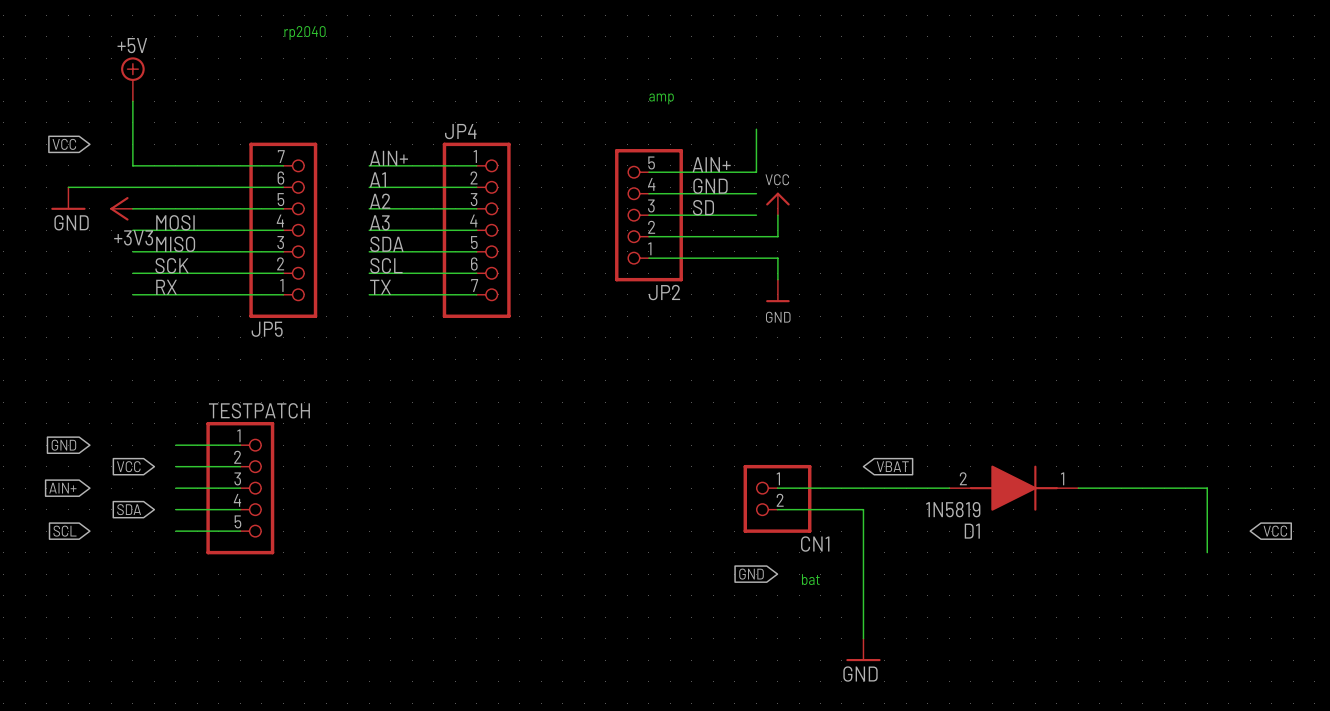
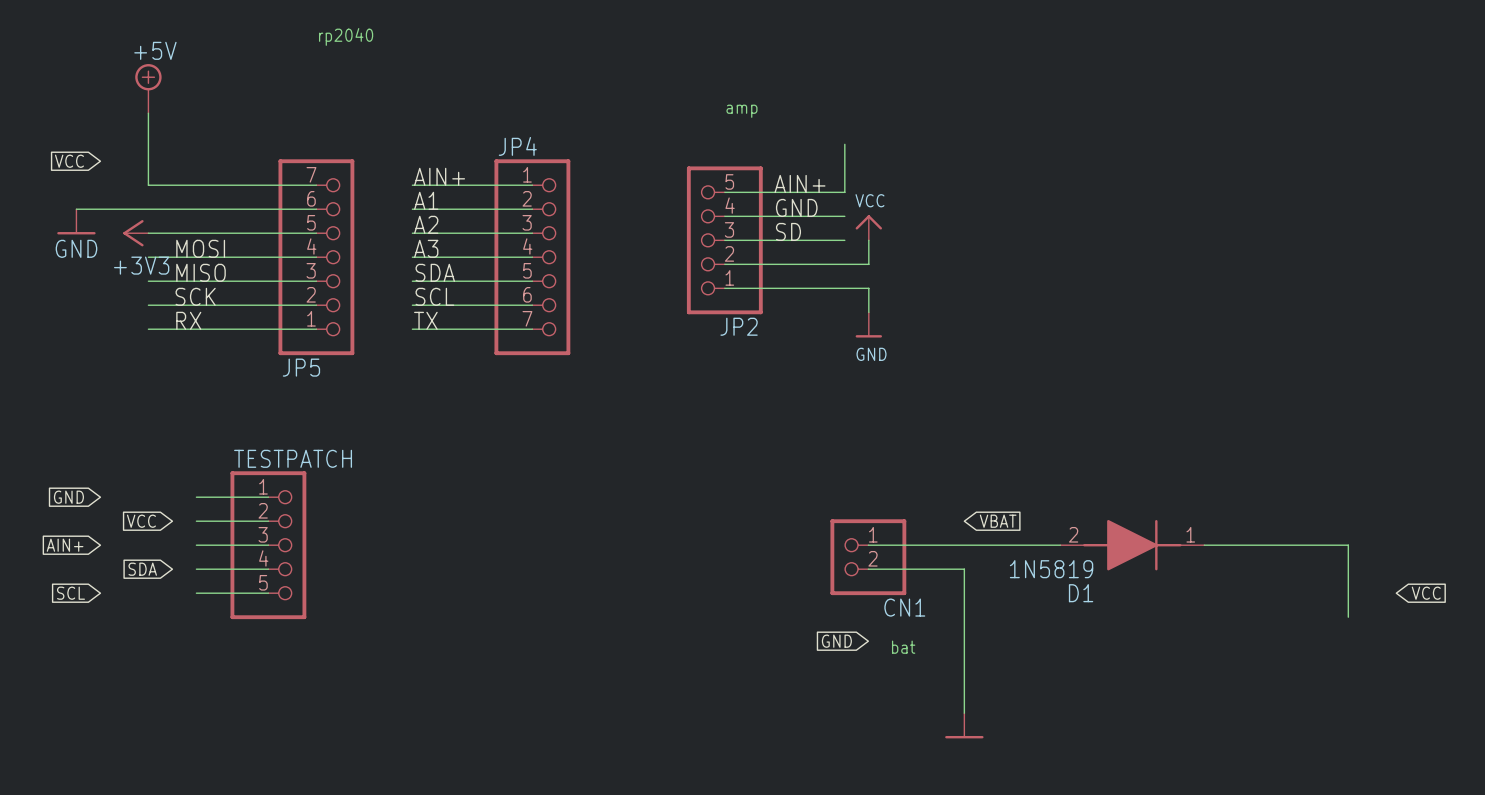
power symbol text: GND (860, 674) -> none

